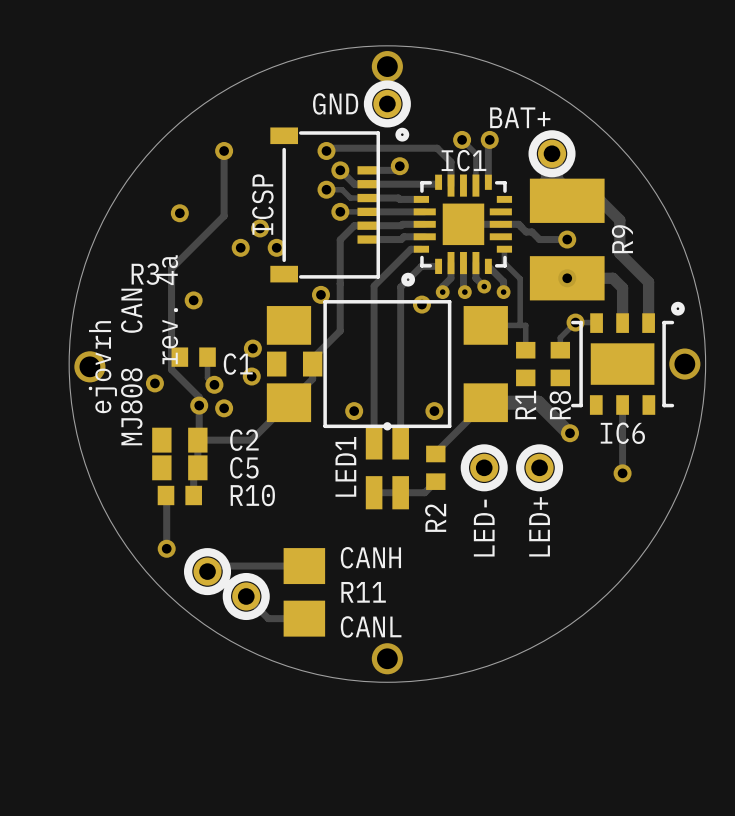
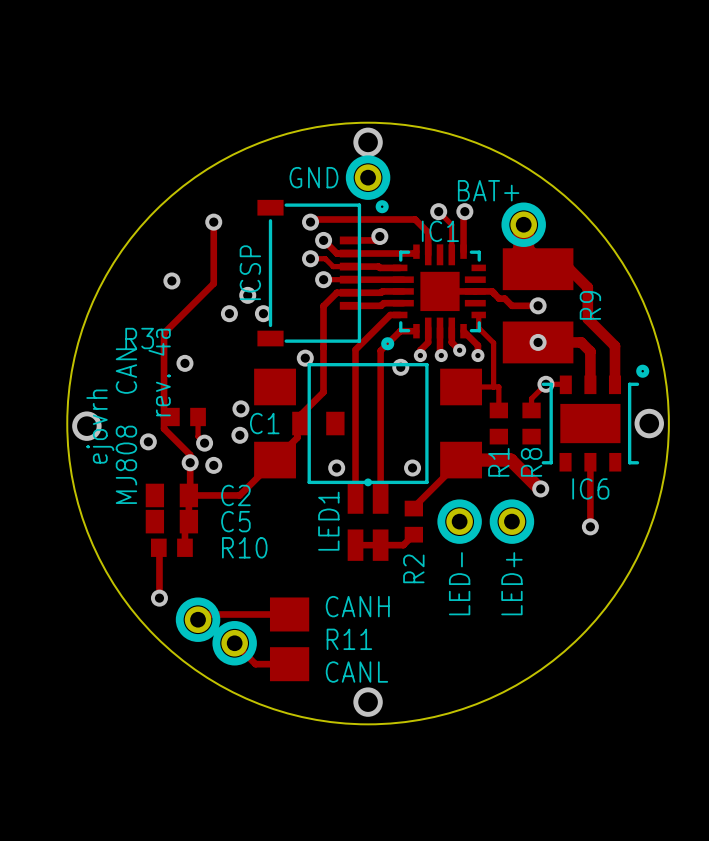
C1 position: (294, 364) -> (318, 423)

